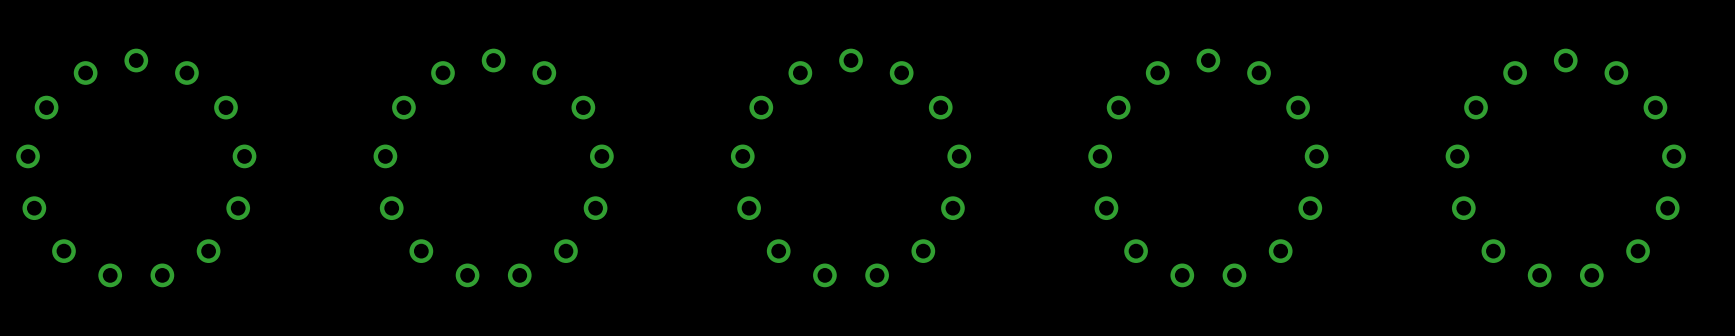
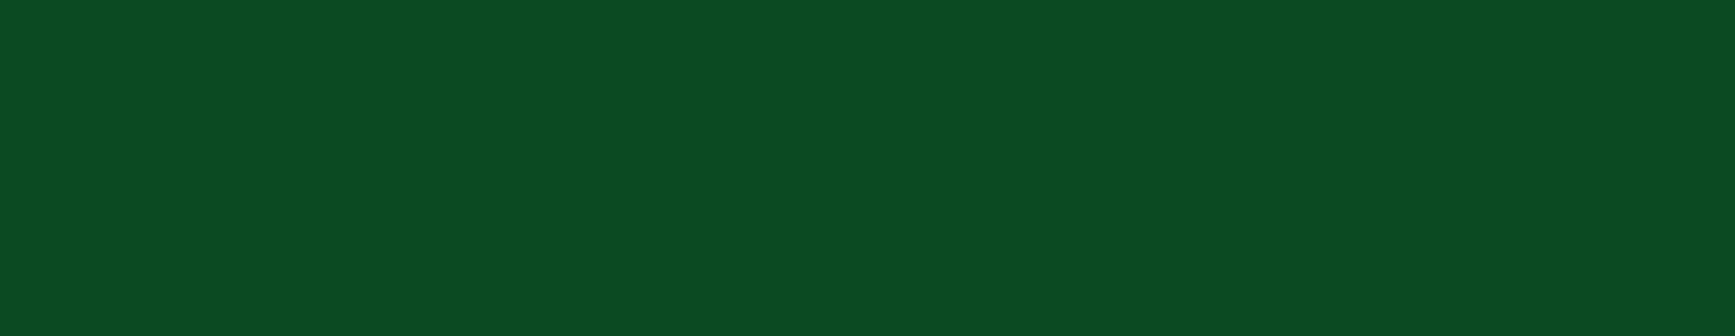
part: (136, 167) -> none
part: (493, 167) -> none
part: (851, 167) -> none
part: (1208, 167) -> none
part: (1565, 167) -> none

